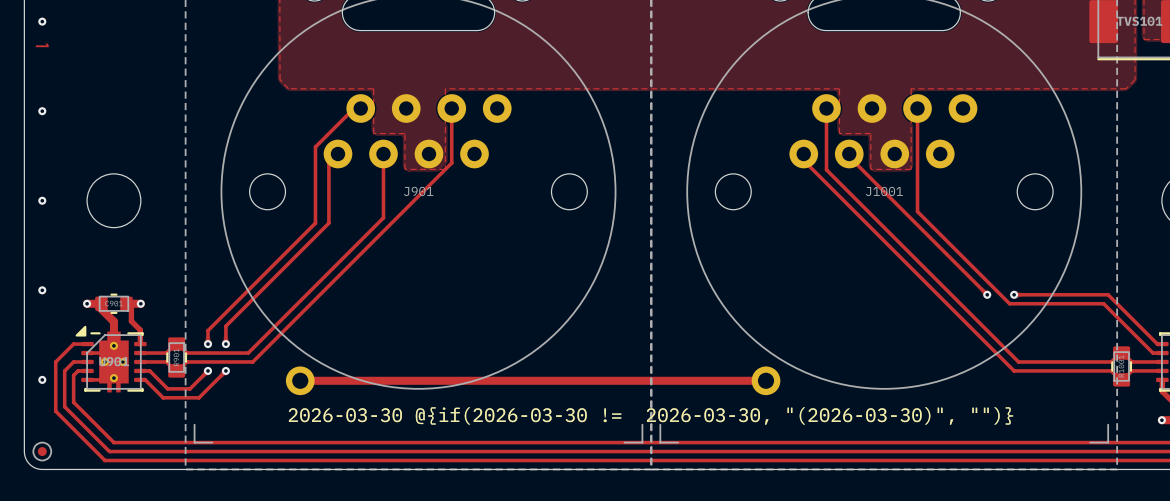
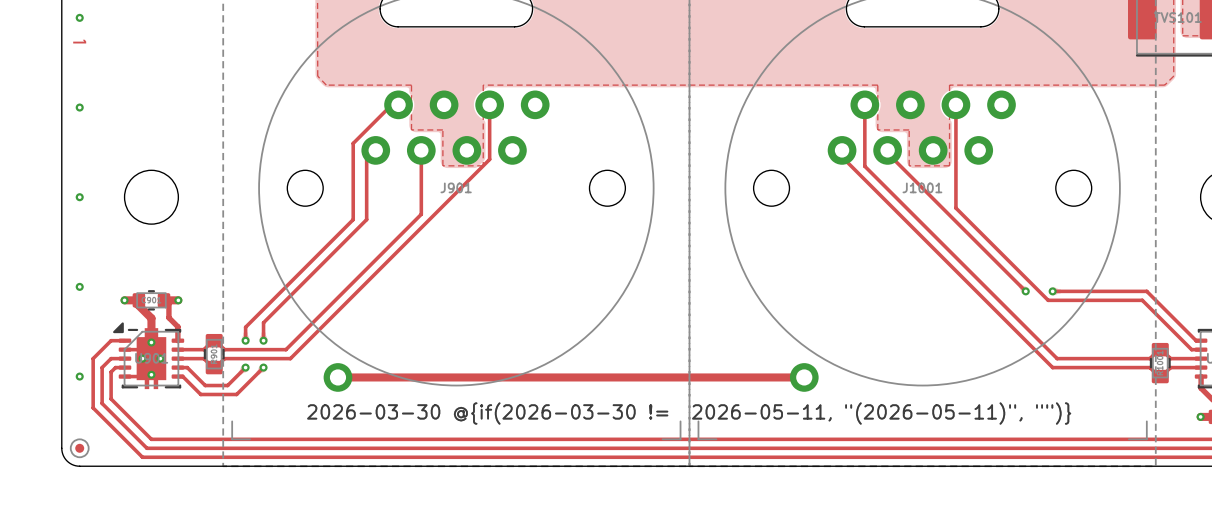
drawing shape: [288, 407, 1014, 425] -> [307, 402, 1072, 425]

